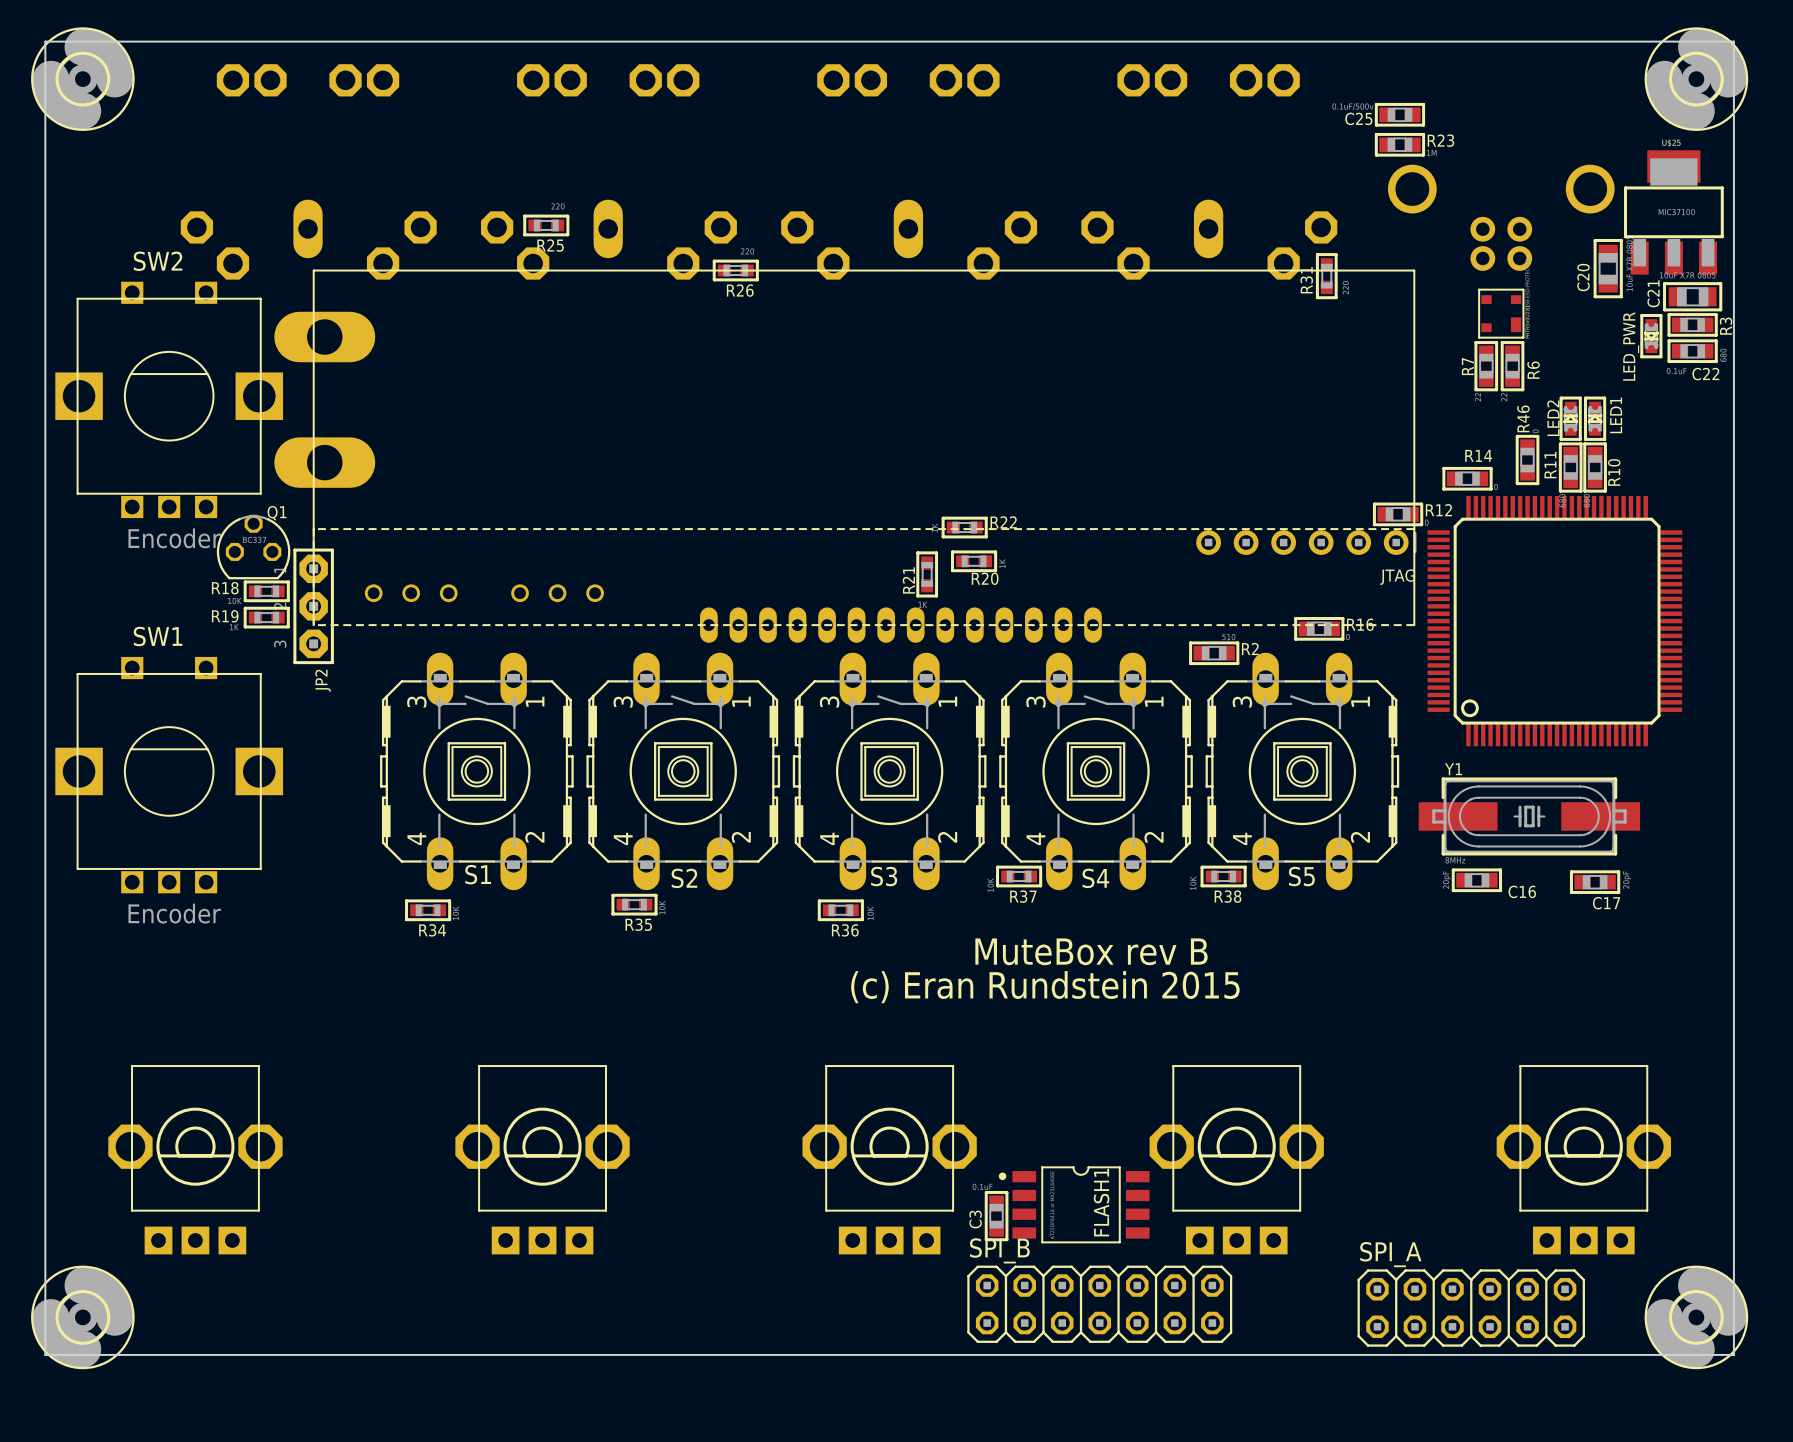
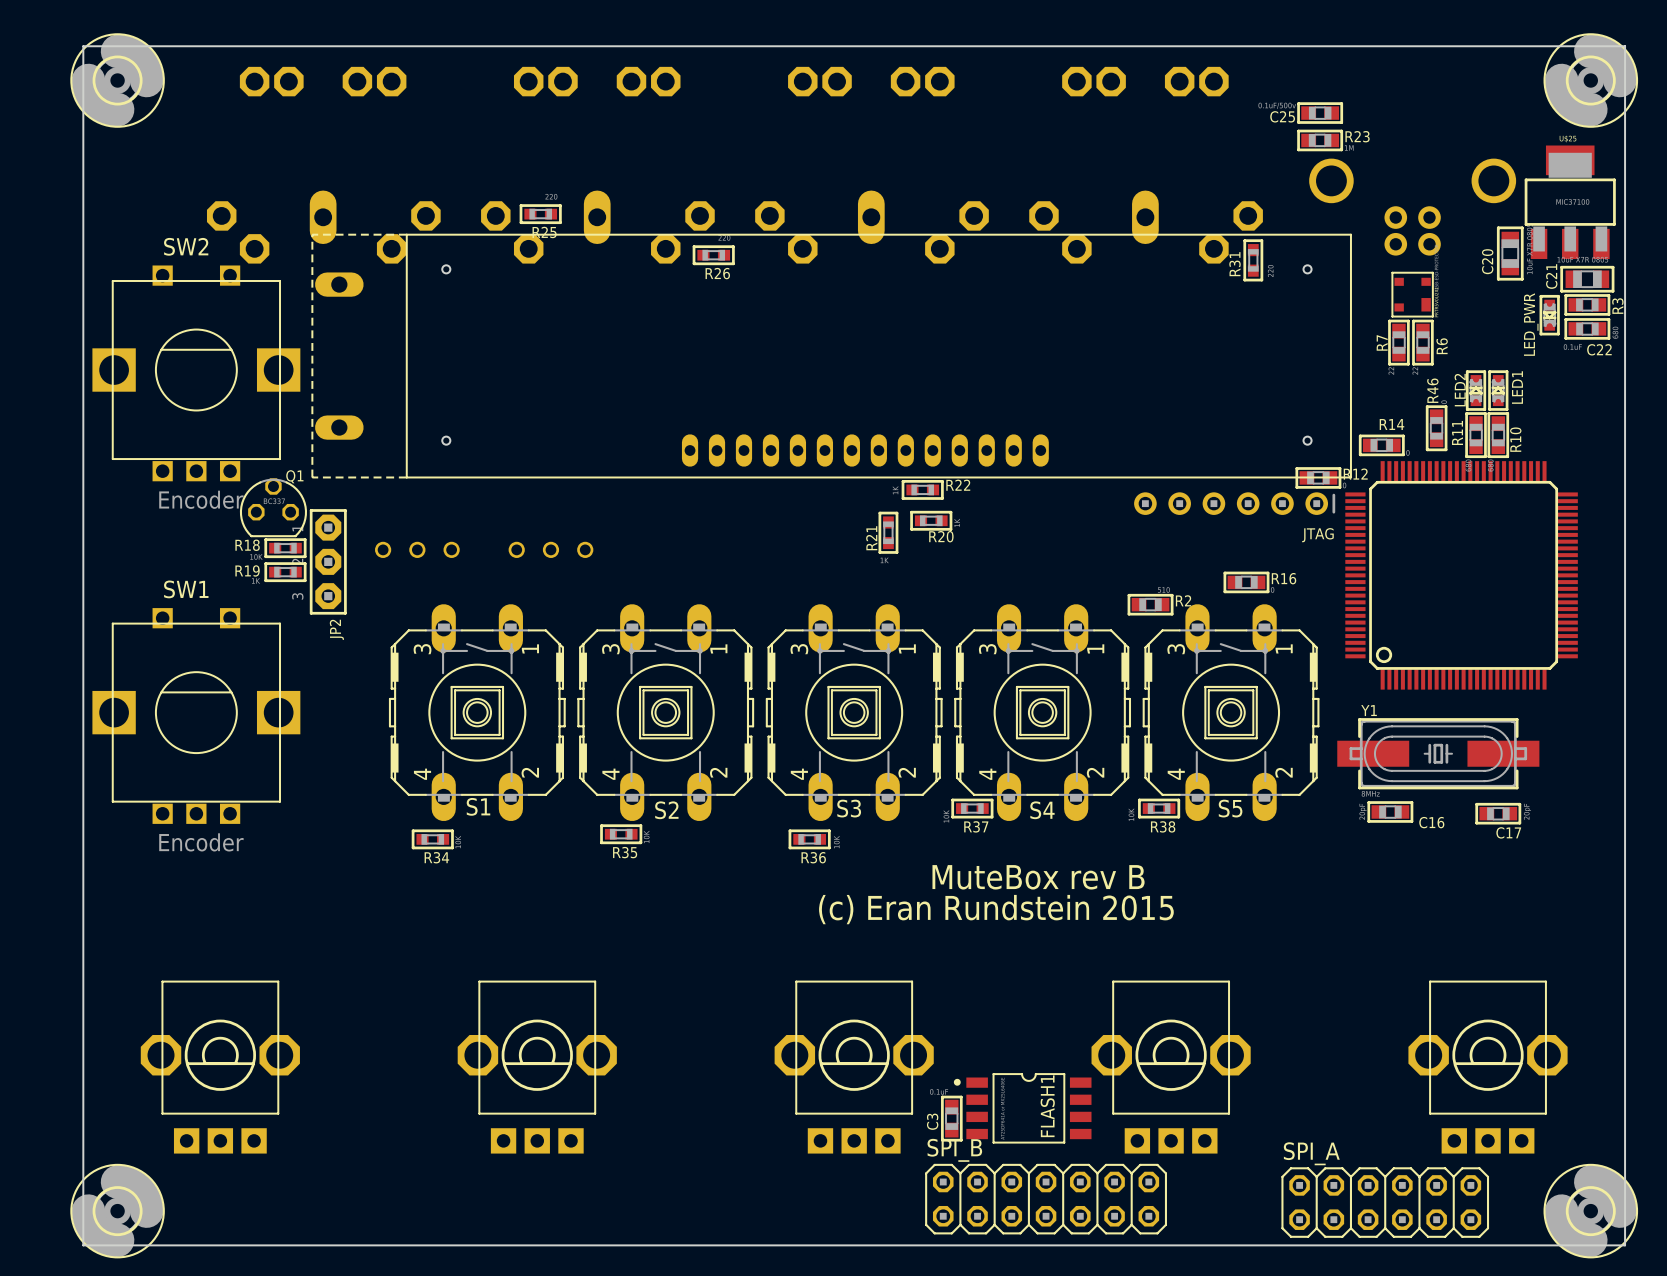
part: none -> (831, 356)
part: (844, 456) -> none

